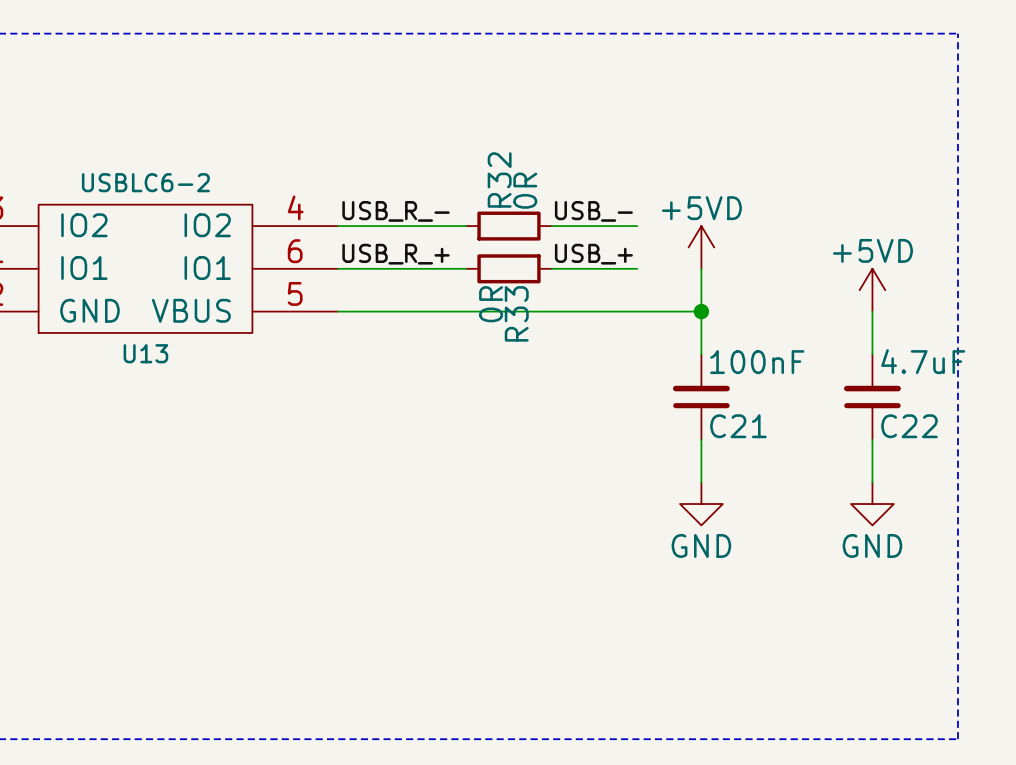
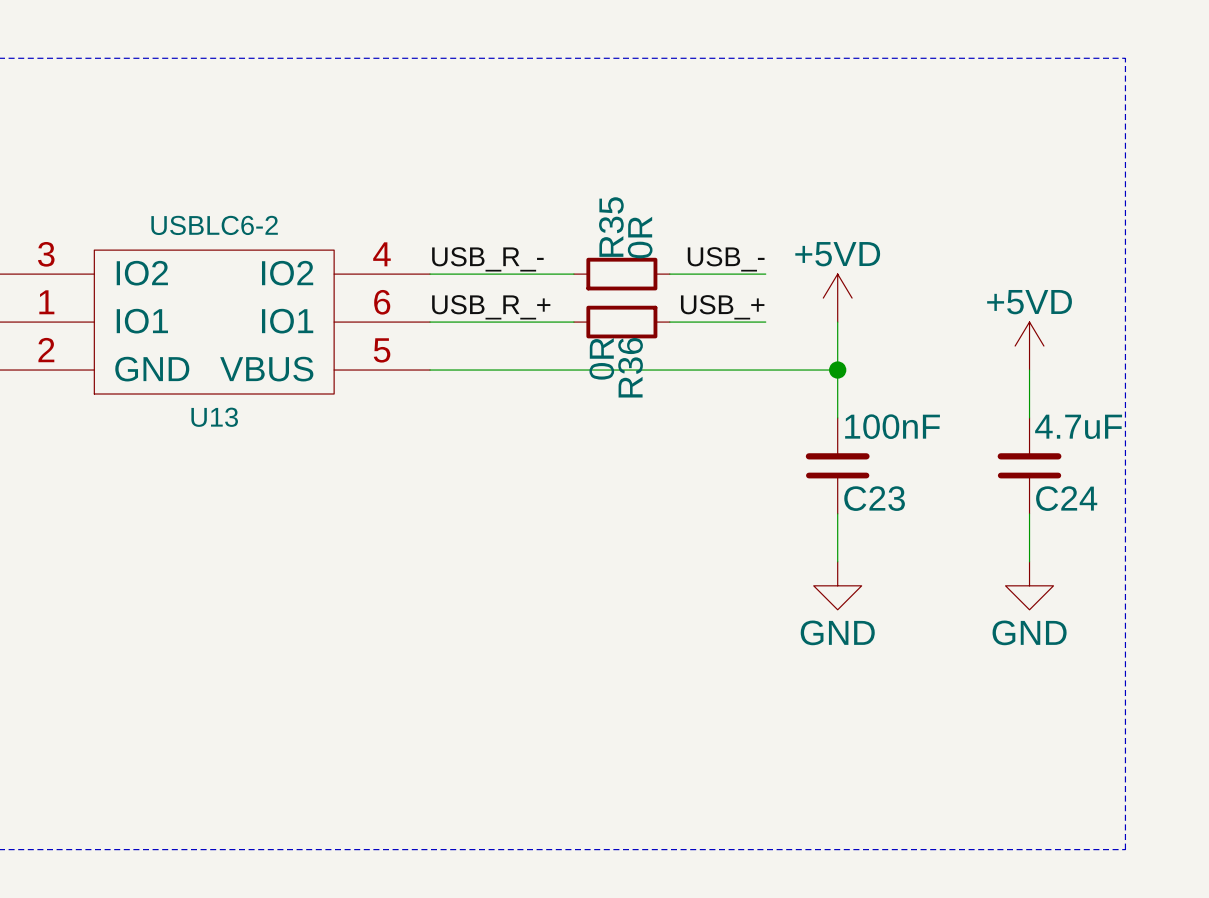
R32 name: R32 (499, 179) -> R35 (611, 227)
R33 name: R33 (516, 313) -> R36 (630, 367)
C21 name: C21 (738, 426) -> C23 (874, 498)
C22 name: C22 (909, 426) -> C24 (1066, 498)

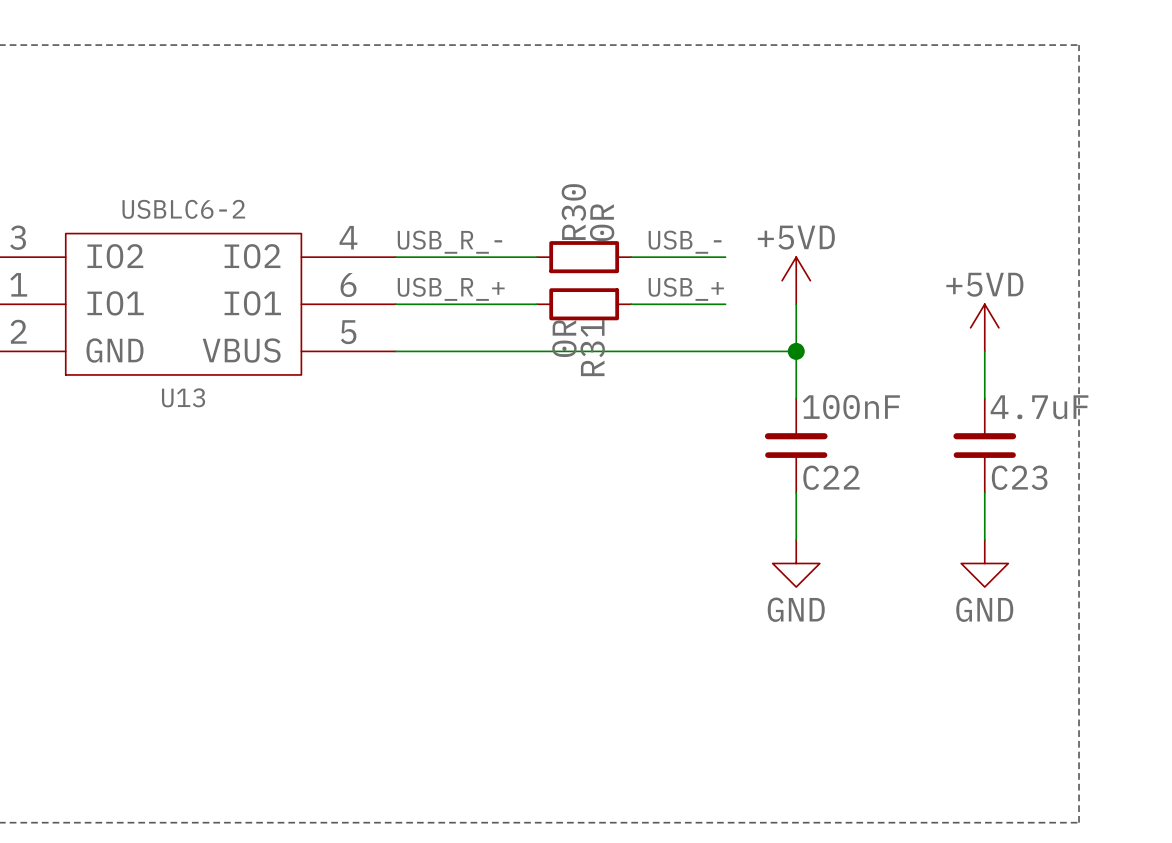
R35 name: R35 (611, 227) -> R30 (573, 212)
R36 name: R36 (630, 367) -> R31 (592, 348)
C23 name: C23 (874, 498) -> C22 (831, 477)
C24 name: C24 (1066, 498) -> C23 (1019, 477)

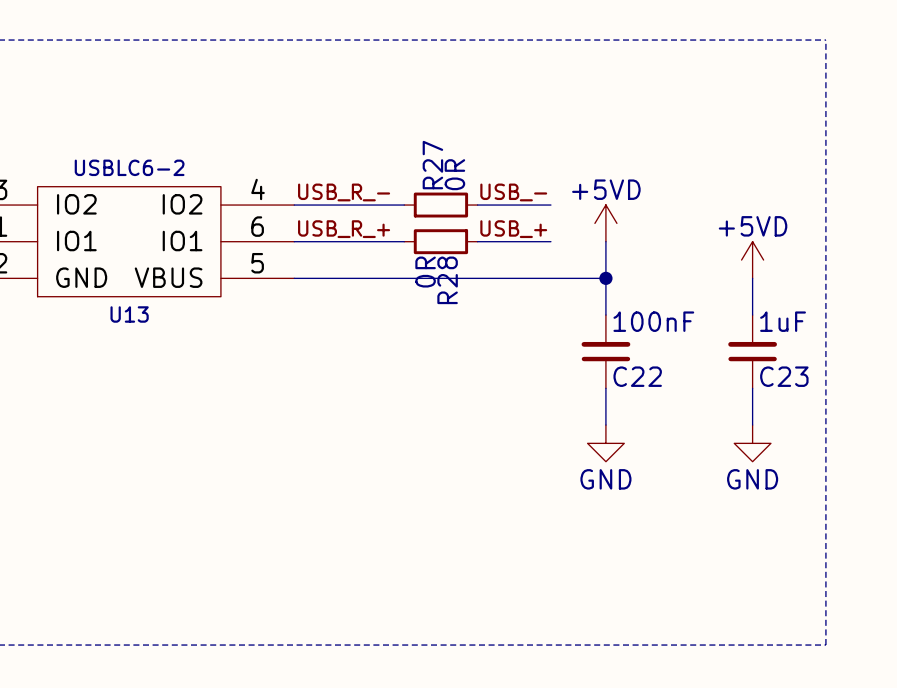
R30 name: R30 (573, 212) -> R27 (432, 165)
R31 name: R31 (592, 348) -> R28 (447, 280)
C23 value: 4.7uF (1039, 407) -> 1uF (783, 321)

